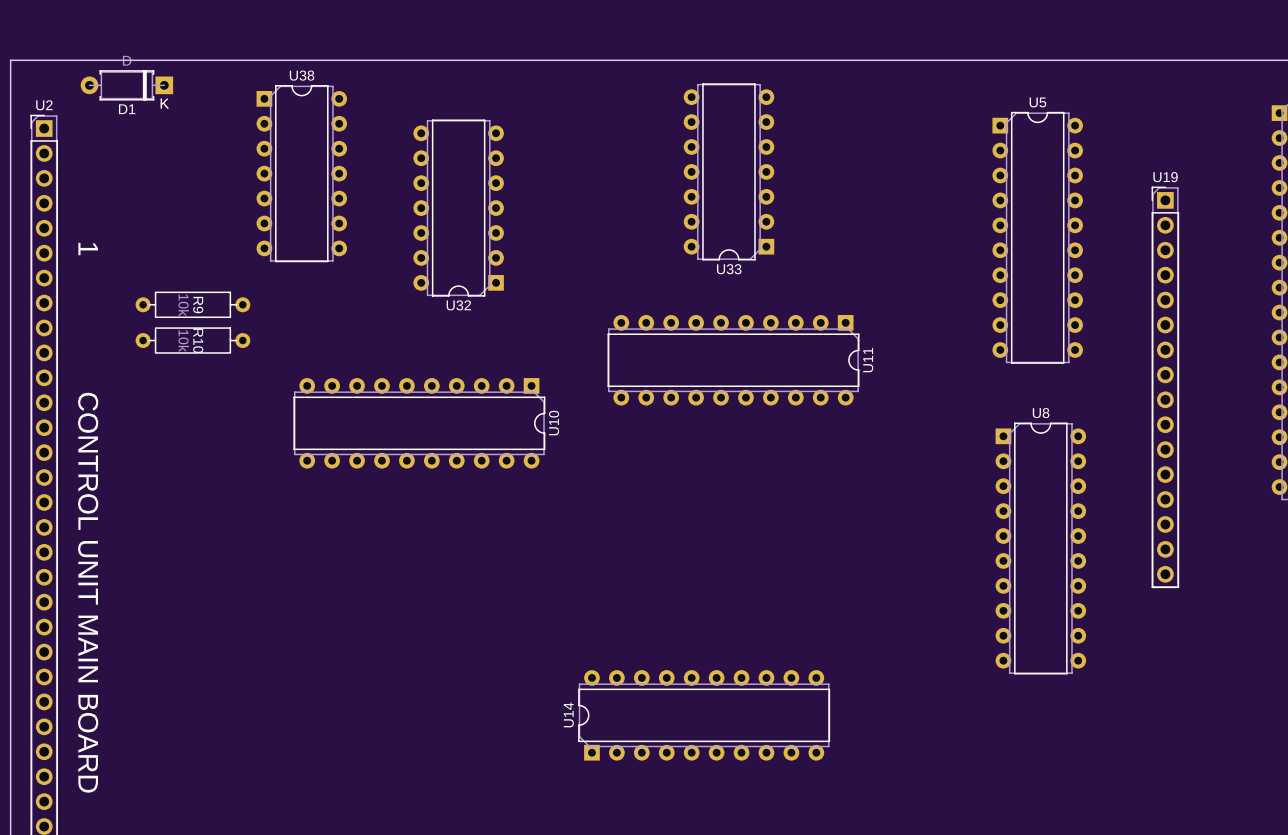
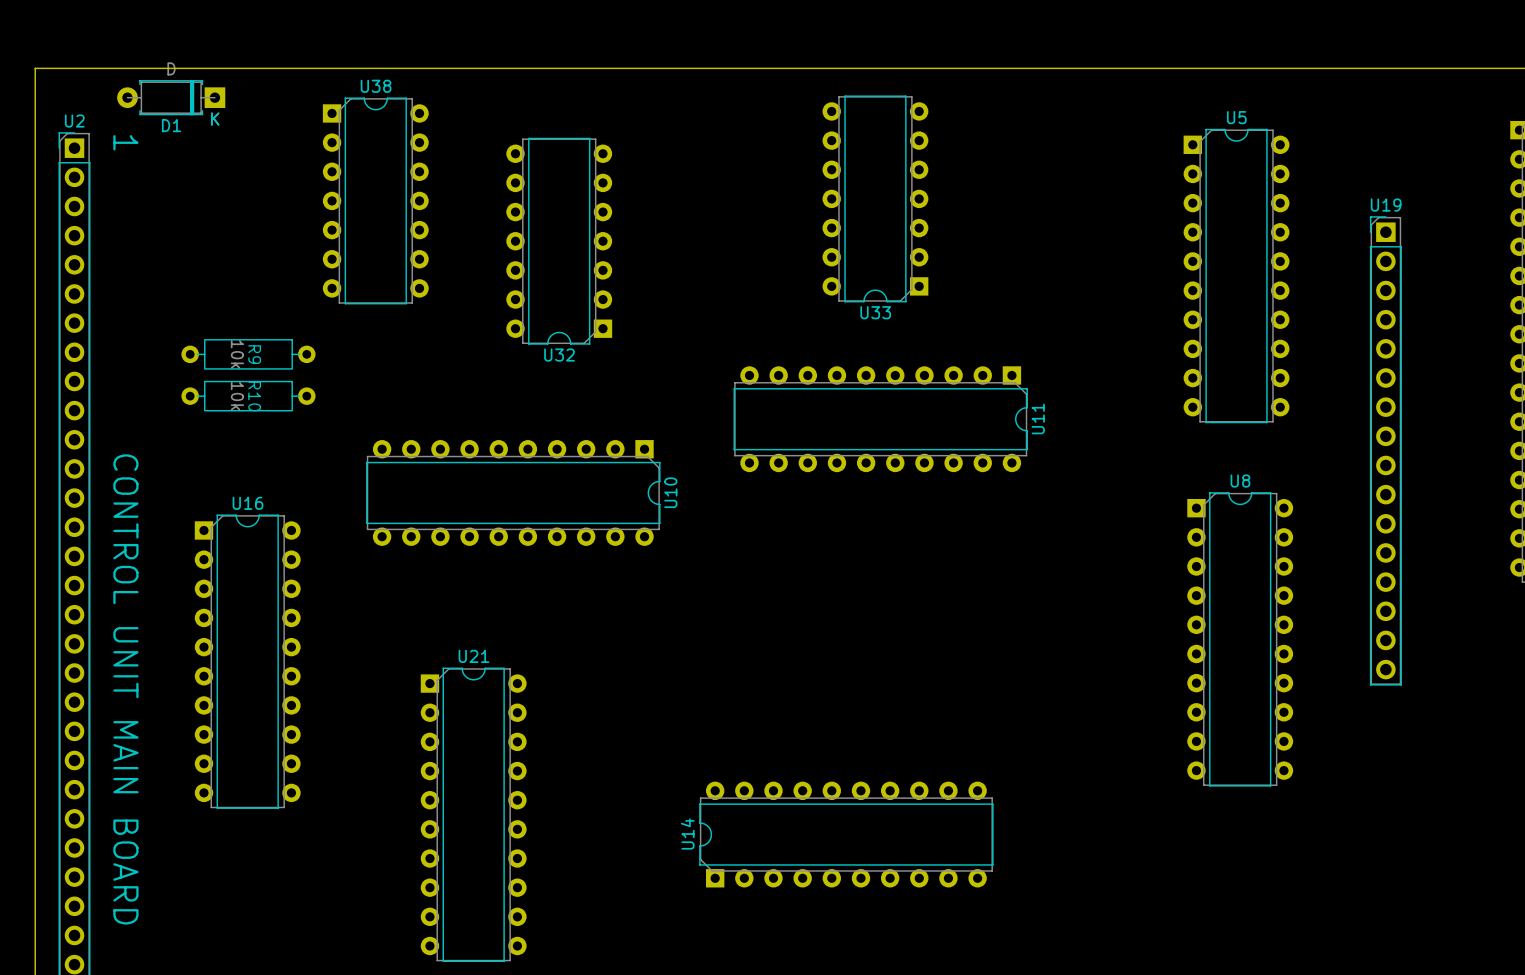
U16: none -> (247, 661)
U21: none -> (473, 814)

